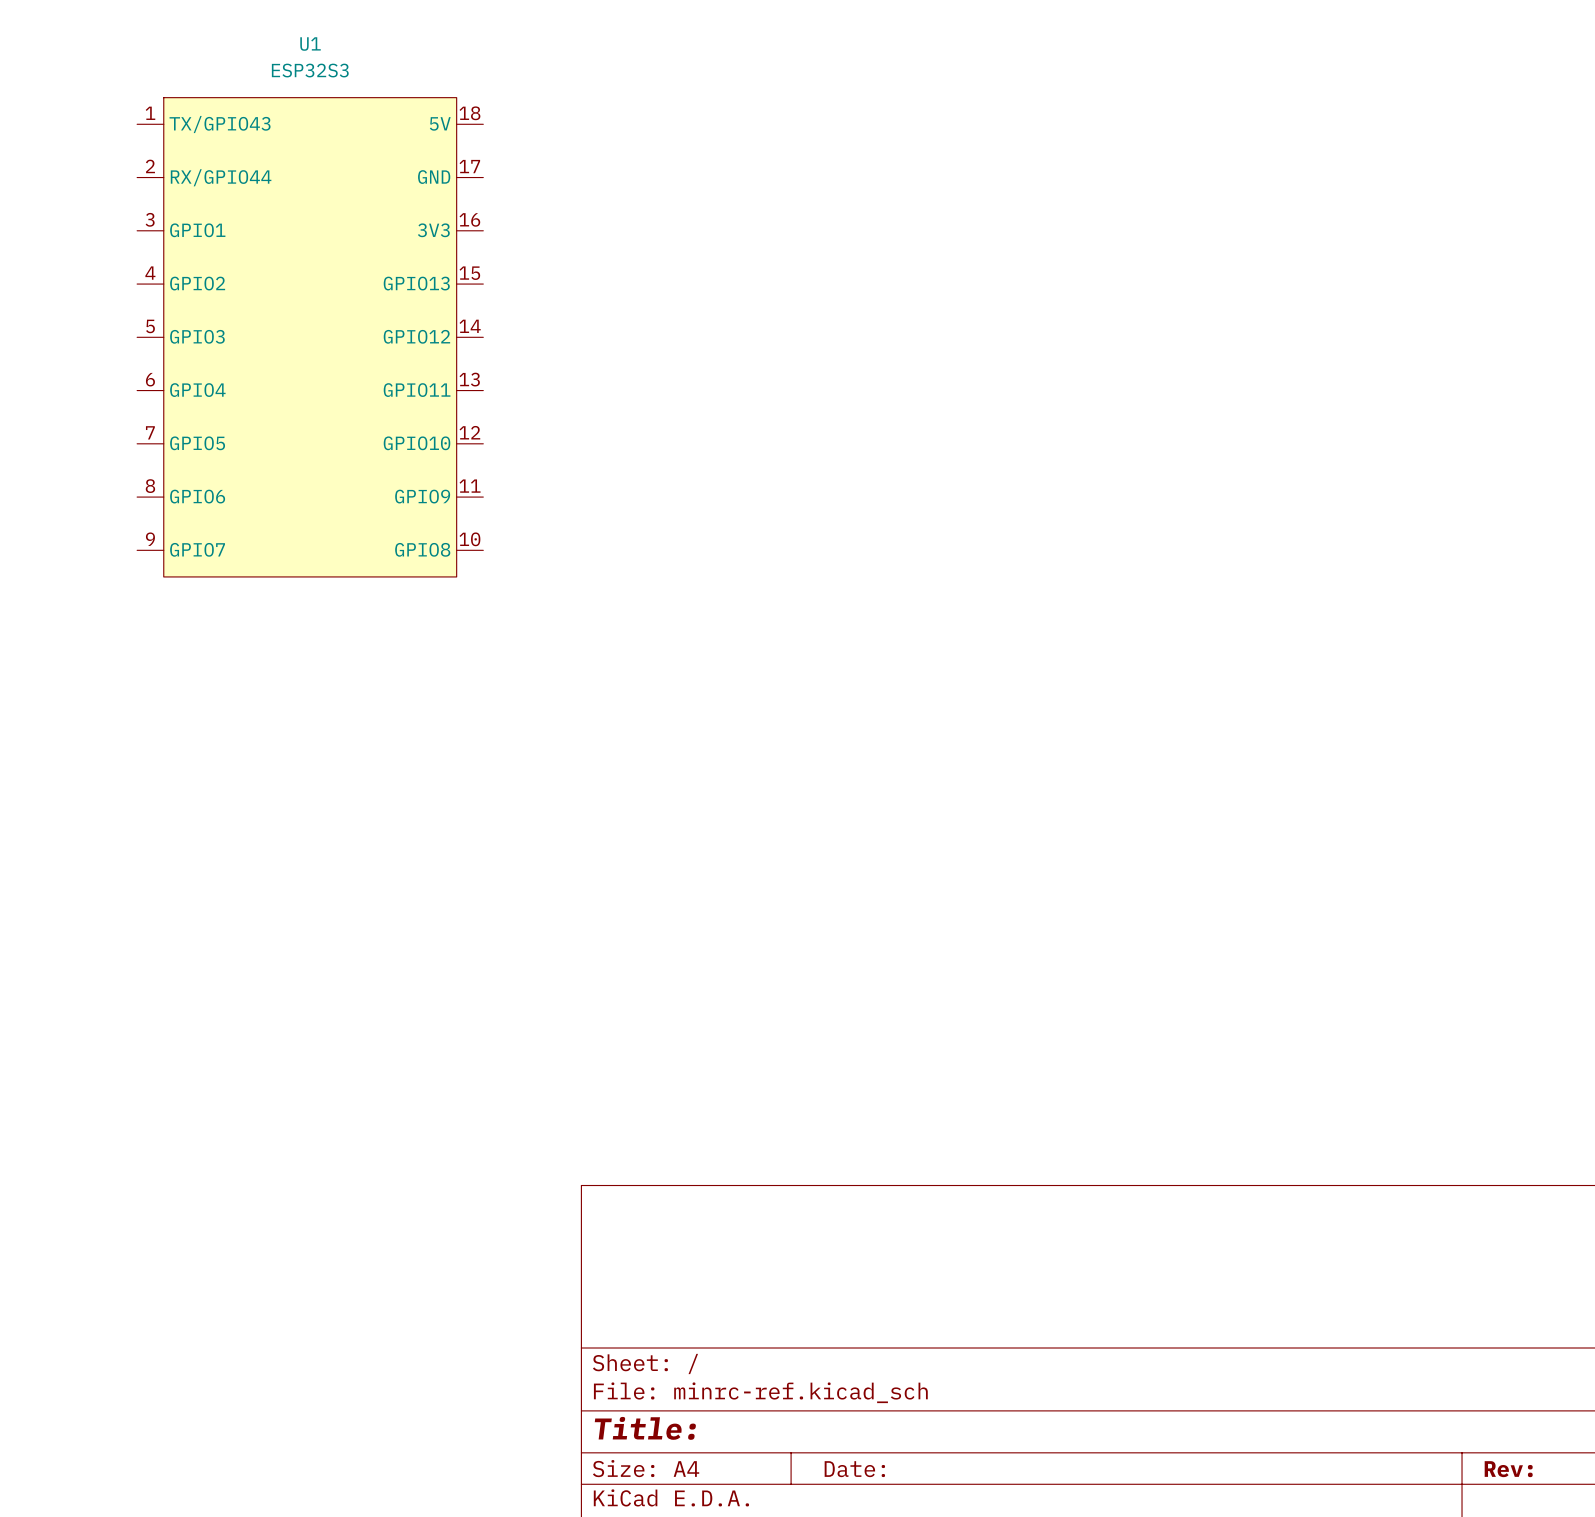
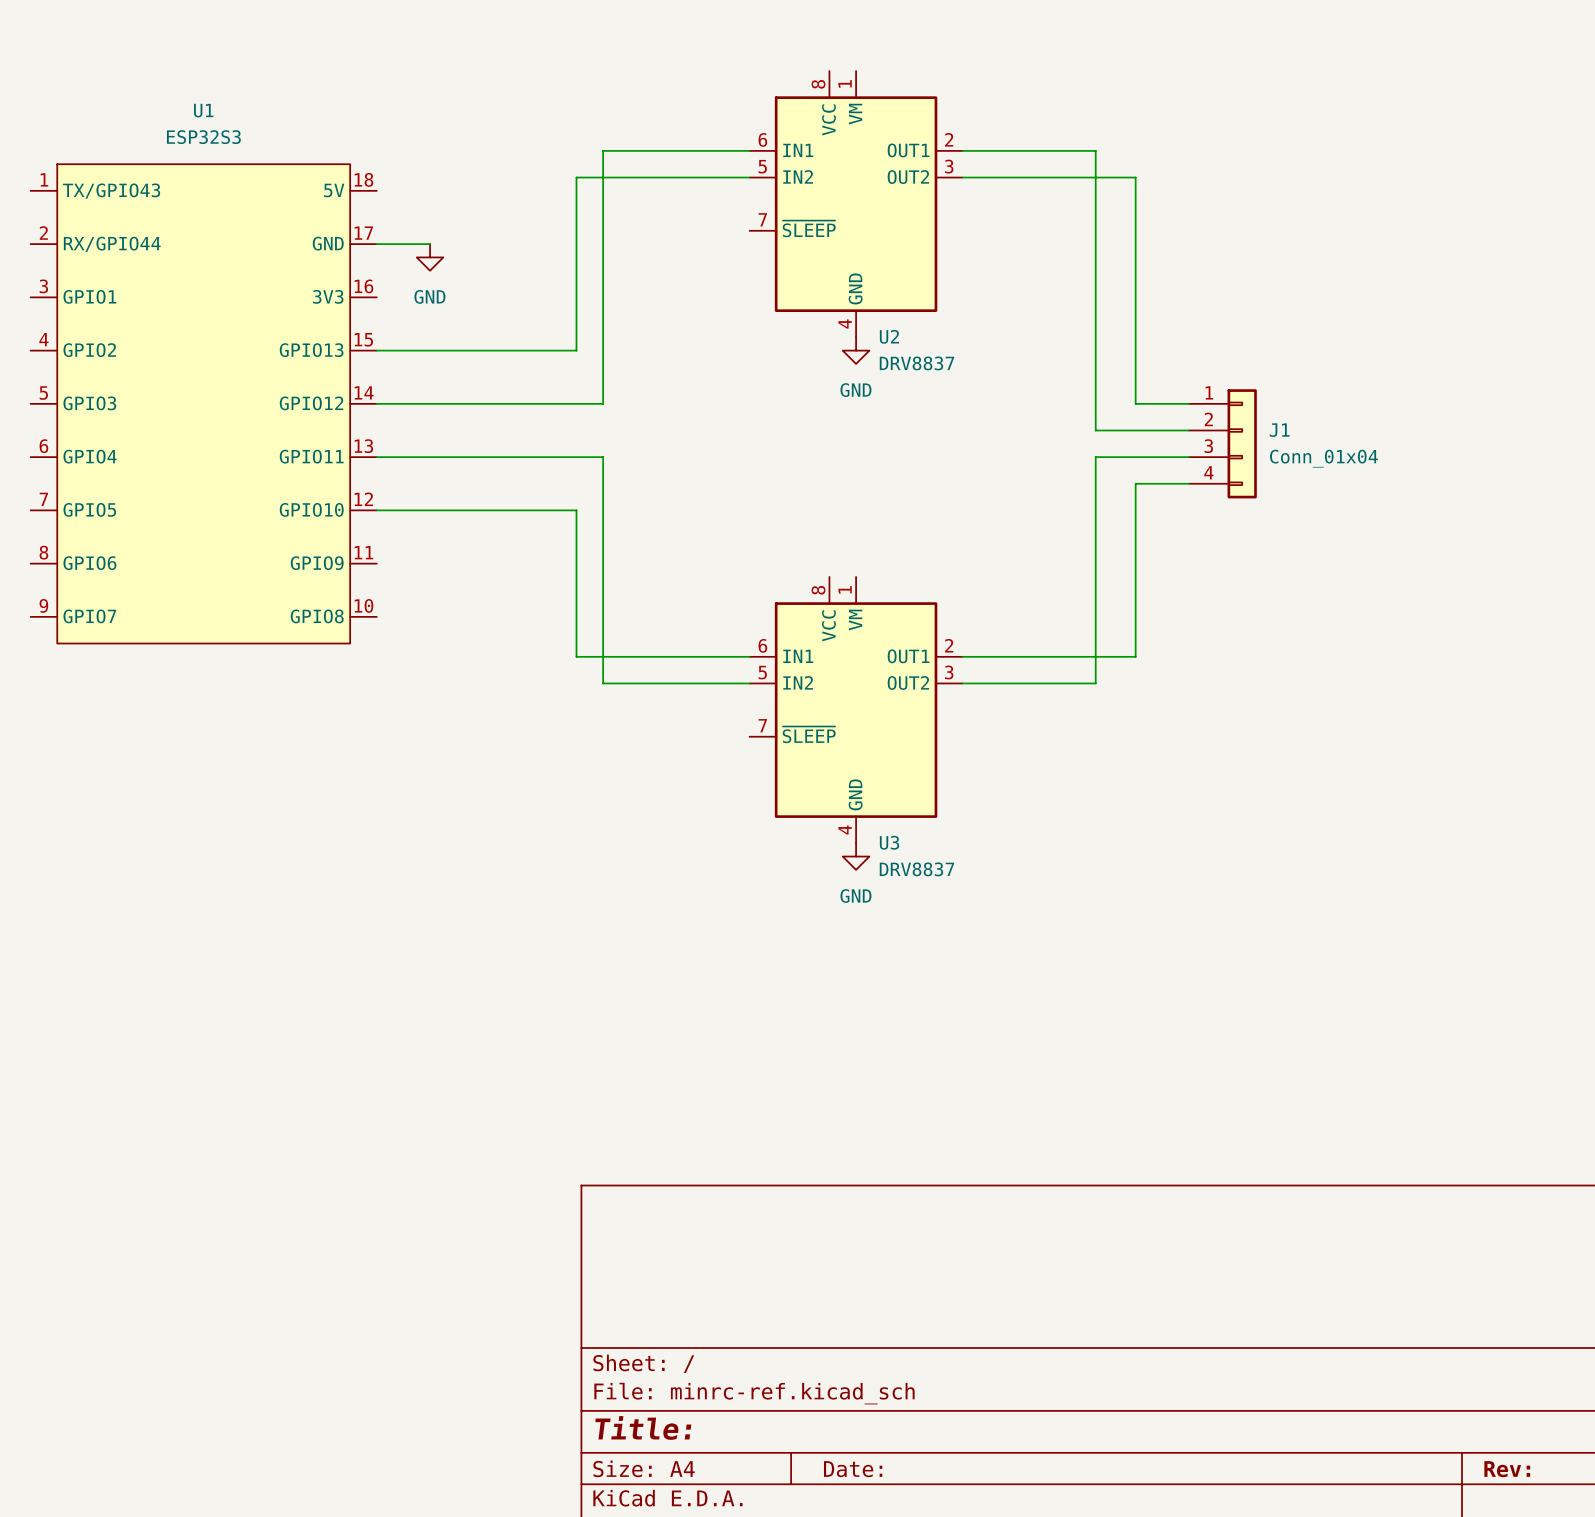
wire: none -> (749, 150) (603, 150) (603, 403) (376, 403)
wire: none -> (962, 150) (1095, 150) (1095, 430) (1188, 430)
wire: none -> (749, 177) (576, 177) (576, 350) (376, 350)
wire: none -> (962, 177) (1135, 177) (1135, 403) (1188, 403)
U2: none -> DRV8837 (856, 204)
power symbol: none -> GND (430, 257)
U1 position: (310, 337) -> (203, 403)
power symbol: none -> GND (856, 350)
J1: none -> Conn_01x04 (1222, 443)
wire: none -> (376, 457) (603, 457) (603, 683) (749, 683)
wire: none -> (1188, 457) (1095, 457) (1095, 683) (962, 683)
wire: none -> (1188, 483) (1135, 483) (1135, 656) (962, 656)
wire: none -> (376, 510) (576, 510) (576, 656) (749, 656)
U3: none -> DRV8837 (856, 710)
power symbol: none -> GND (856, 856)

